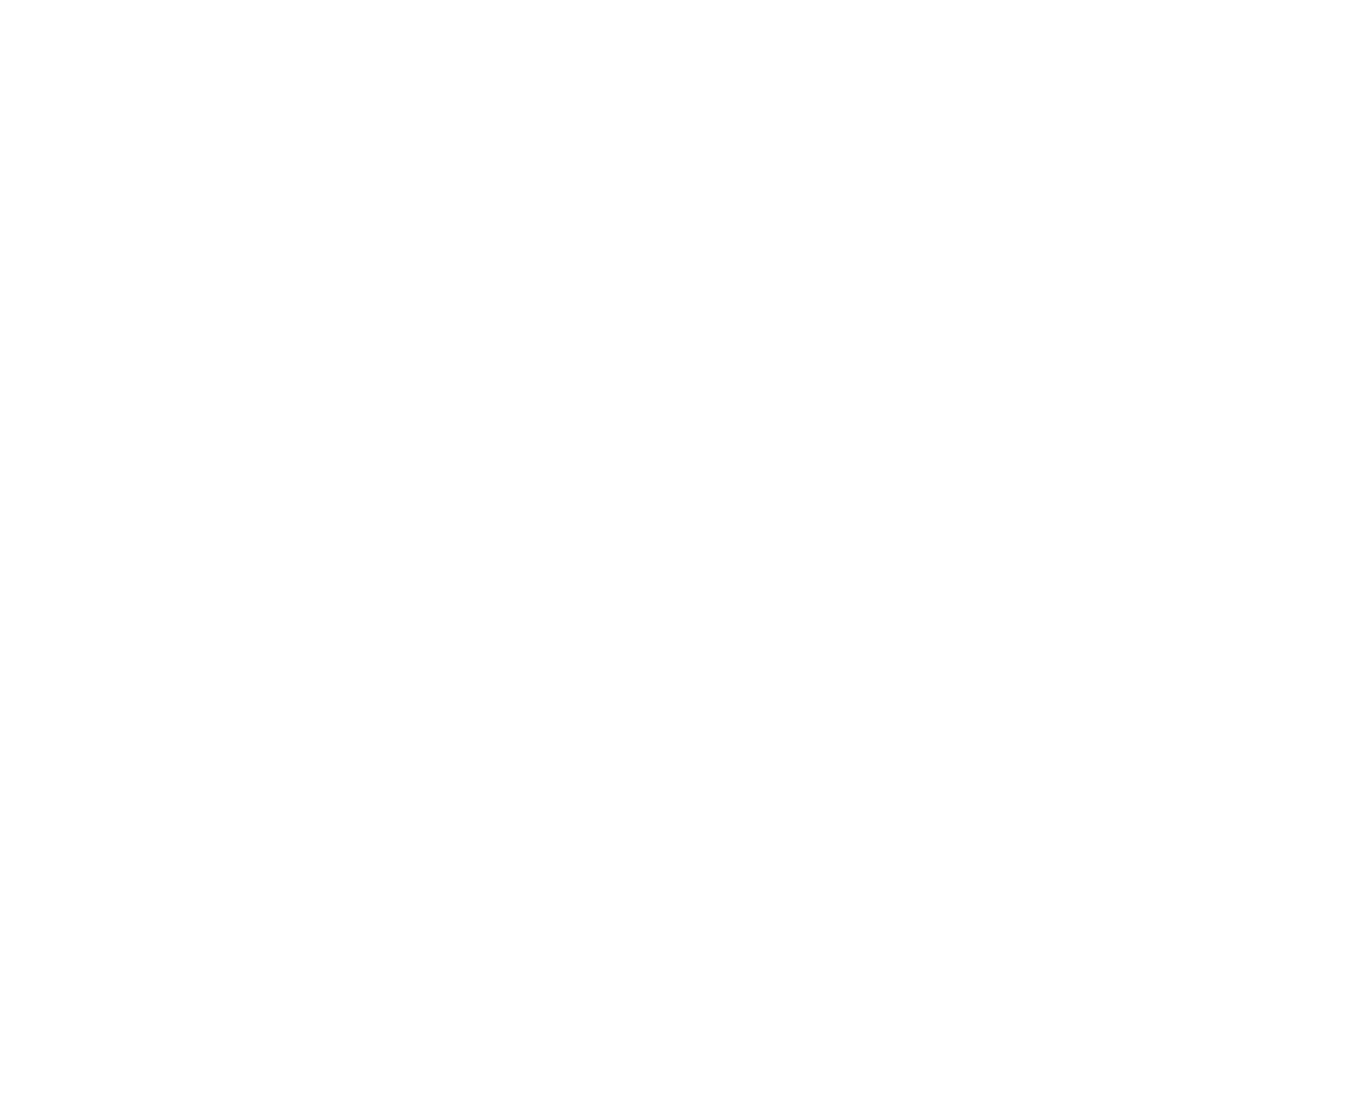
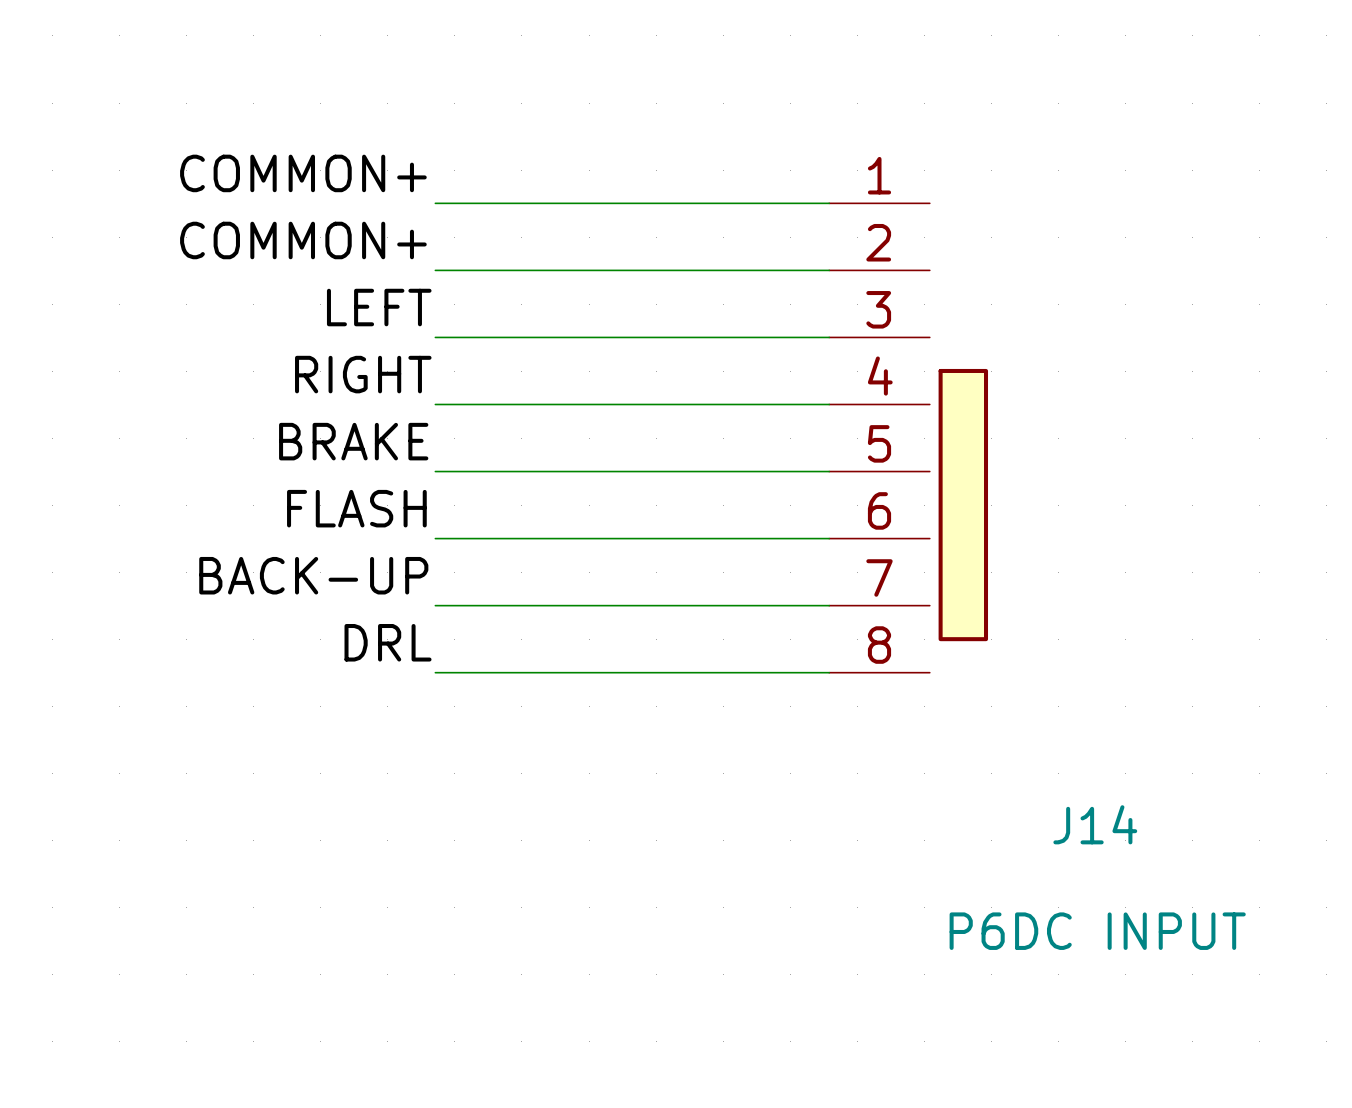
label: none -> COMMON+ (303, 173)
wire: none -> (435, 203) (829, 203)
label: none -> COMMON+ (303, 240)
wire: none -> (435, 270) (829, 270)
label: none -> LEFT (379, 307)
wire: none -> (435, 337) (829, 337)
label: none -> RIGHT (363, 374)
wire: none -> (435, 404) (829, 404)
J14: none -> P6DC INPUT (908, 438)
label: none -> BRAKE (353, 441)
wire: none -> (435, 471) (829, 471)
label: none -> FLASH (356, 508)
wire: none -> (435, 538) (829, 538)
label: none -> BACK-UP (313, 575)
wire: none -> (435, 605) (829, 605)
label: none -> DRL (388, 642)
wire: none -> (435, 672) (829, 672)

